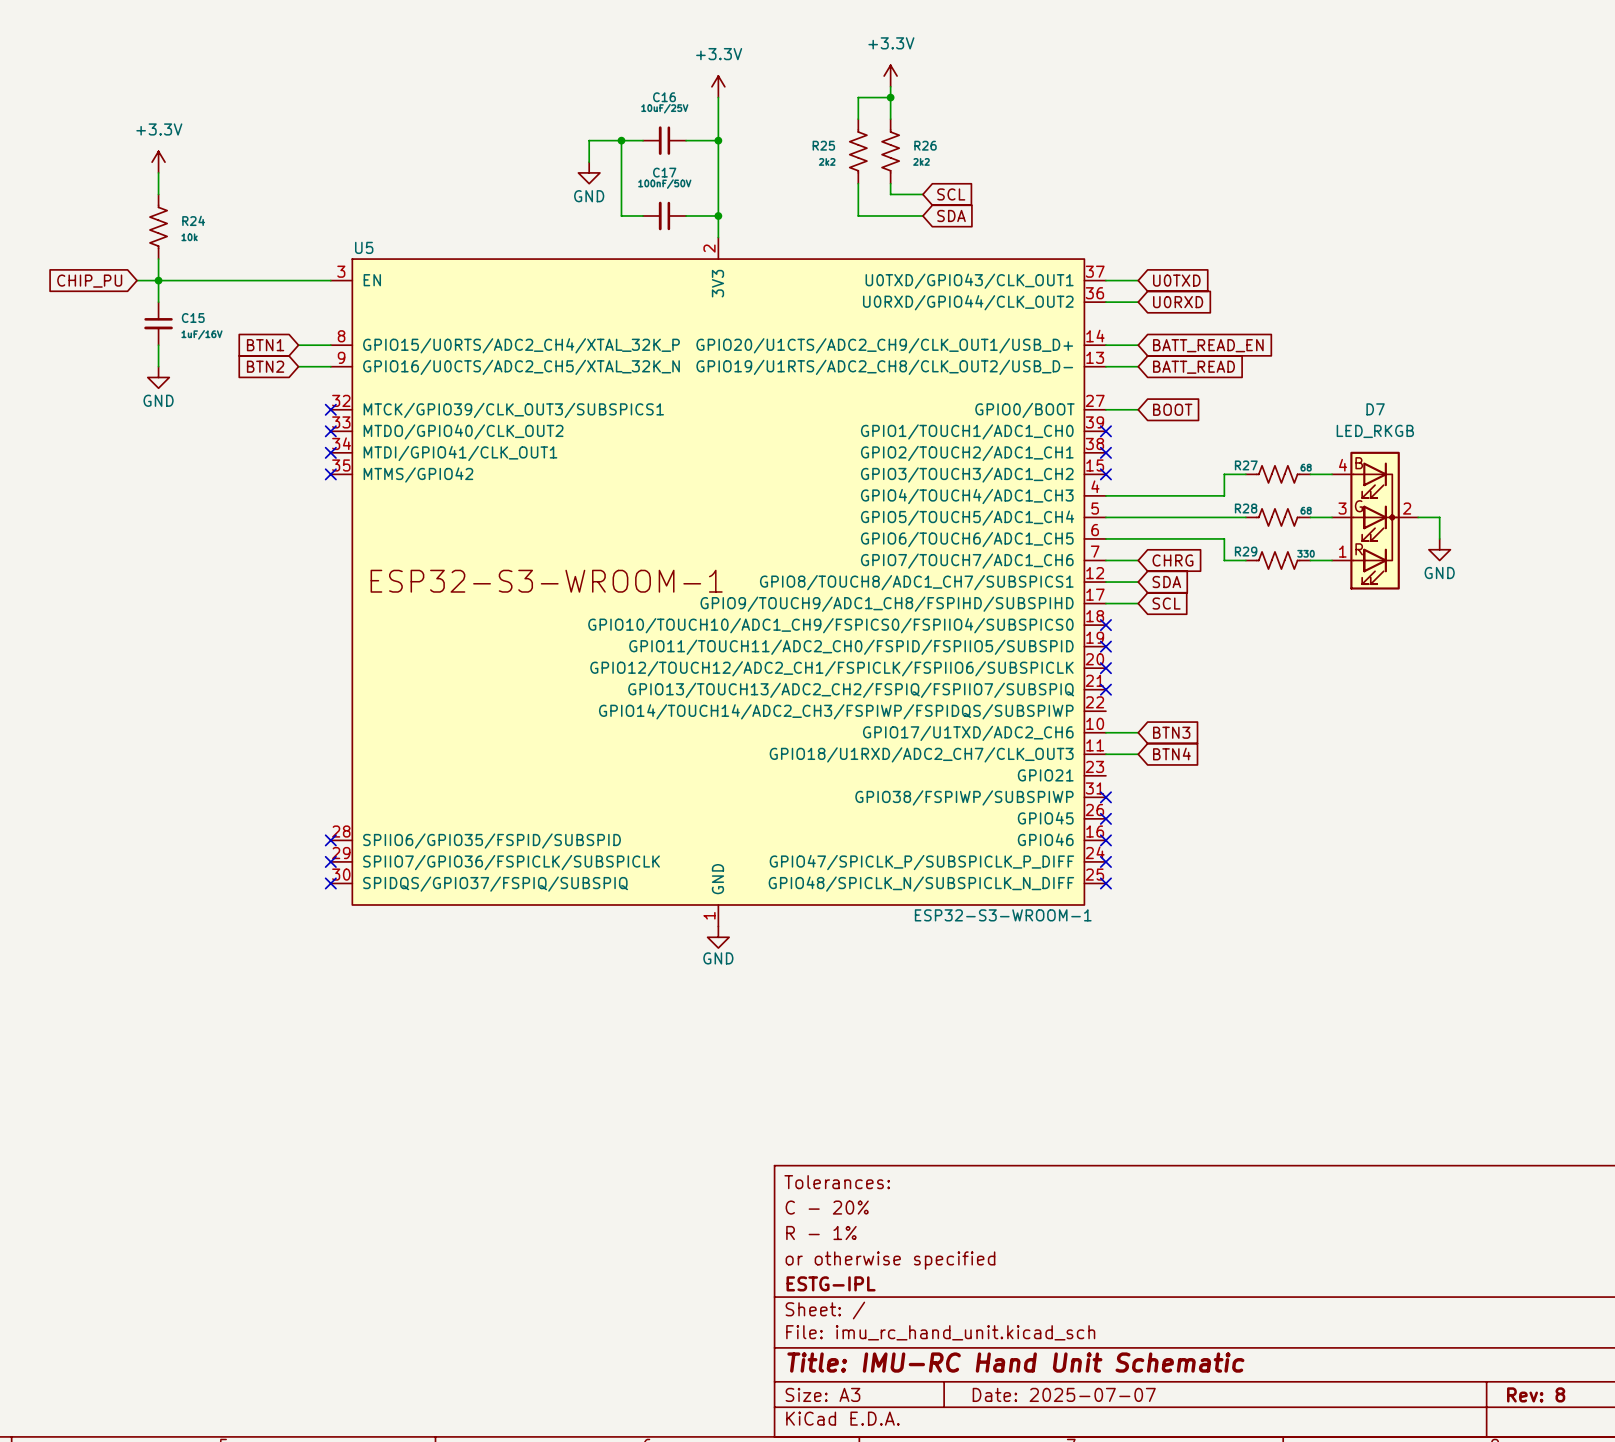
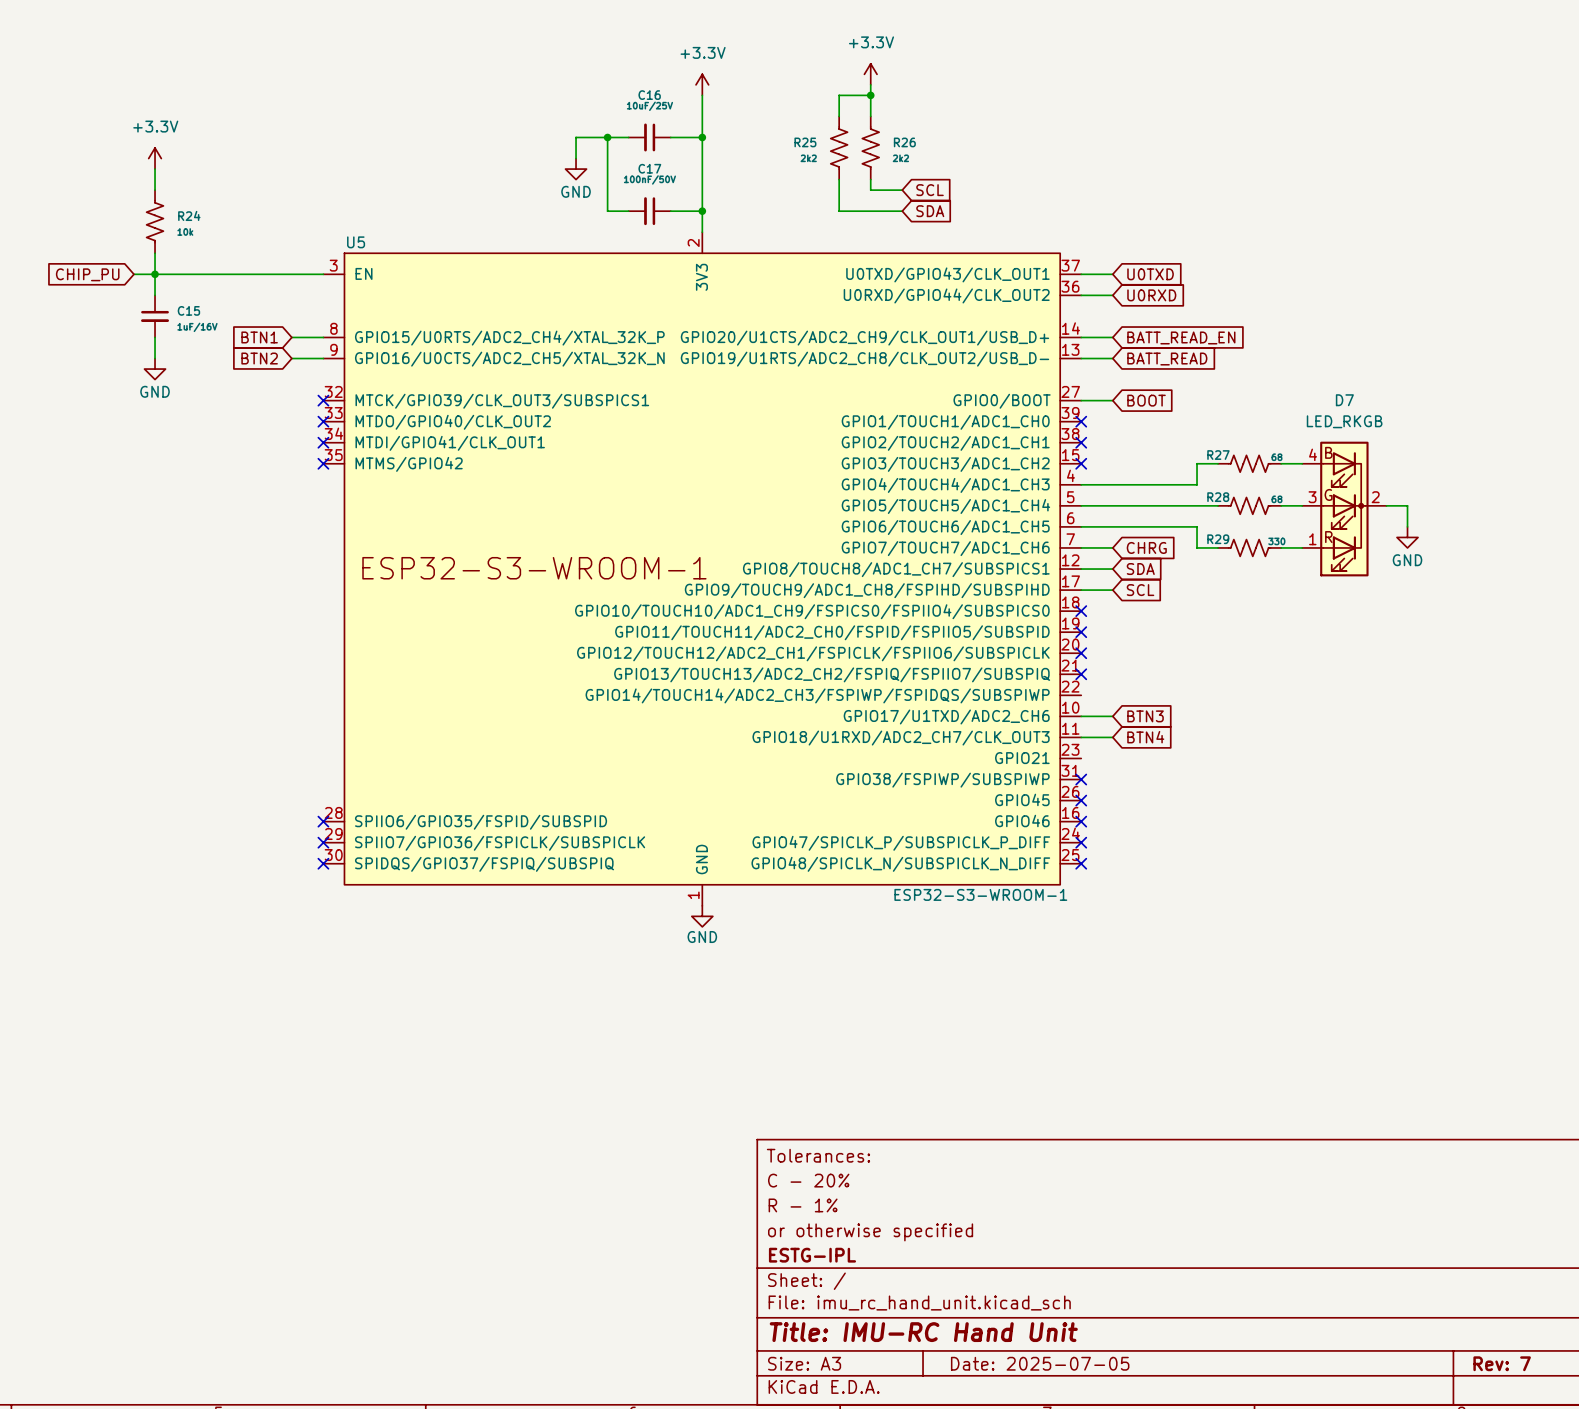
title block: Title: IMU-RC Hand Unit Schematic (1015, 1362) -> Title: IMU-RC Hand Unit (923, 1332)
title block: Date: 2025-07-07 (1064, 1394) -> Date: 2025-07-05 (1040, 1363)
title block: Rev: 8 (1536, 1394) -> Rev: 7 (1502, 1363)

